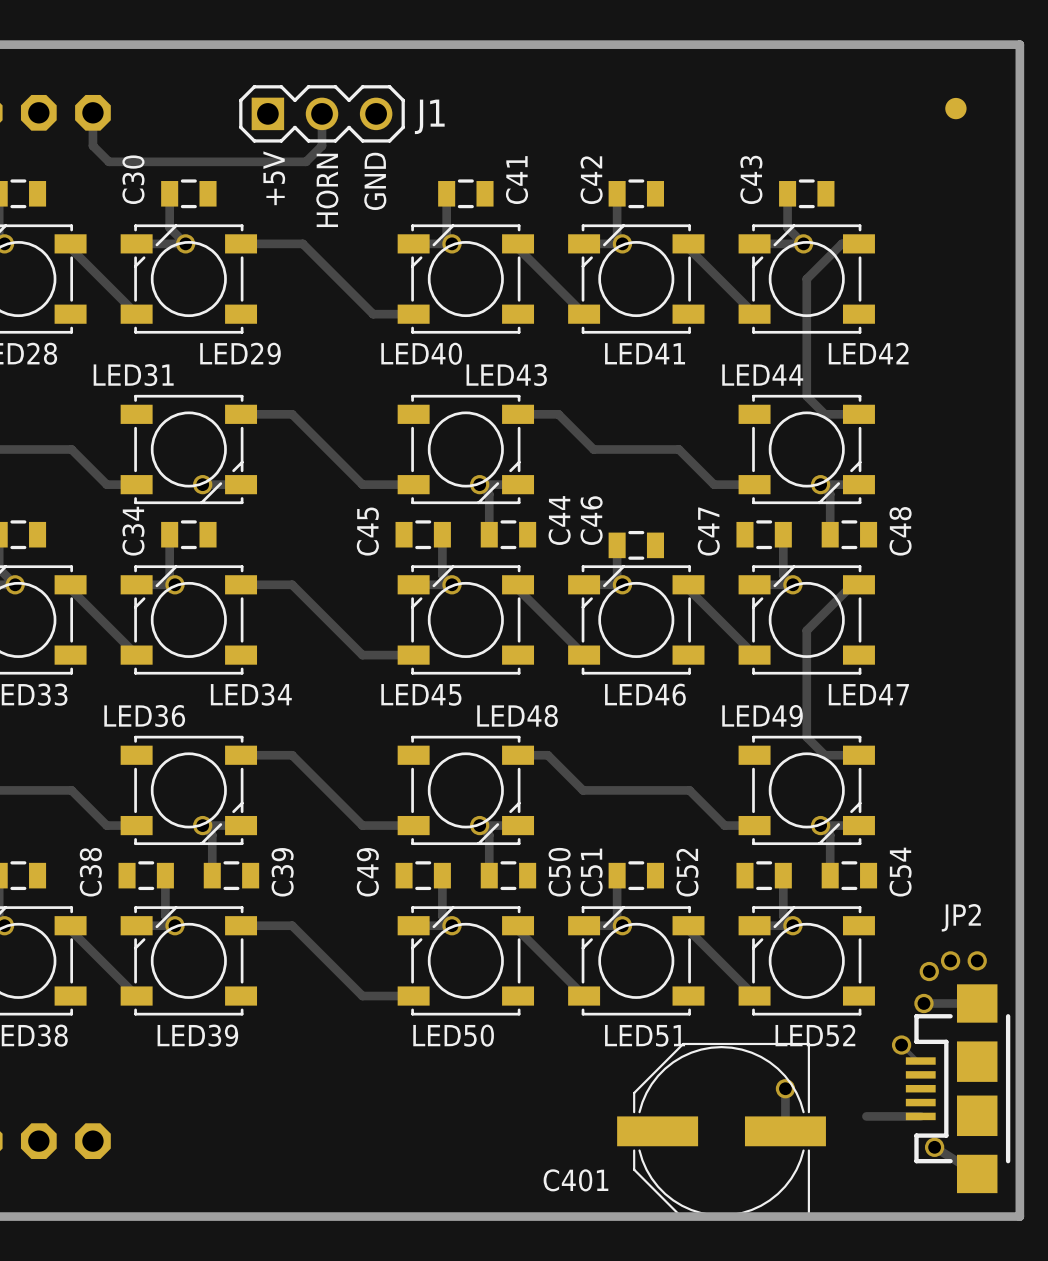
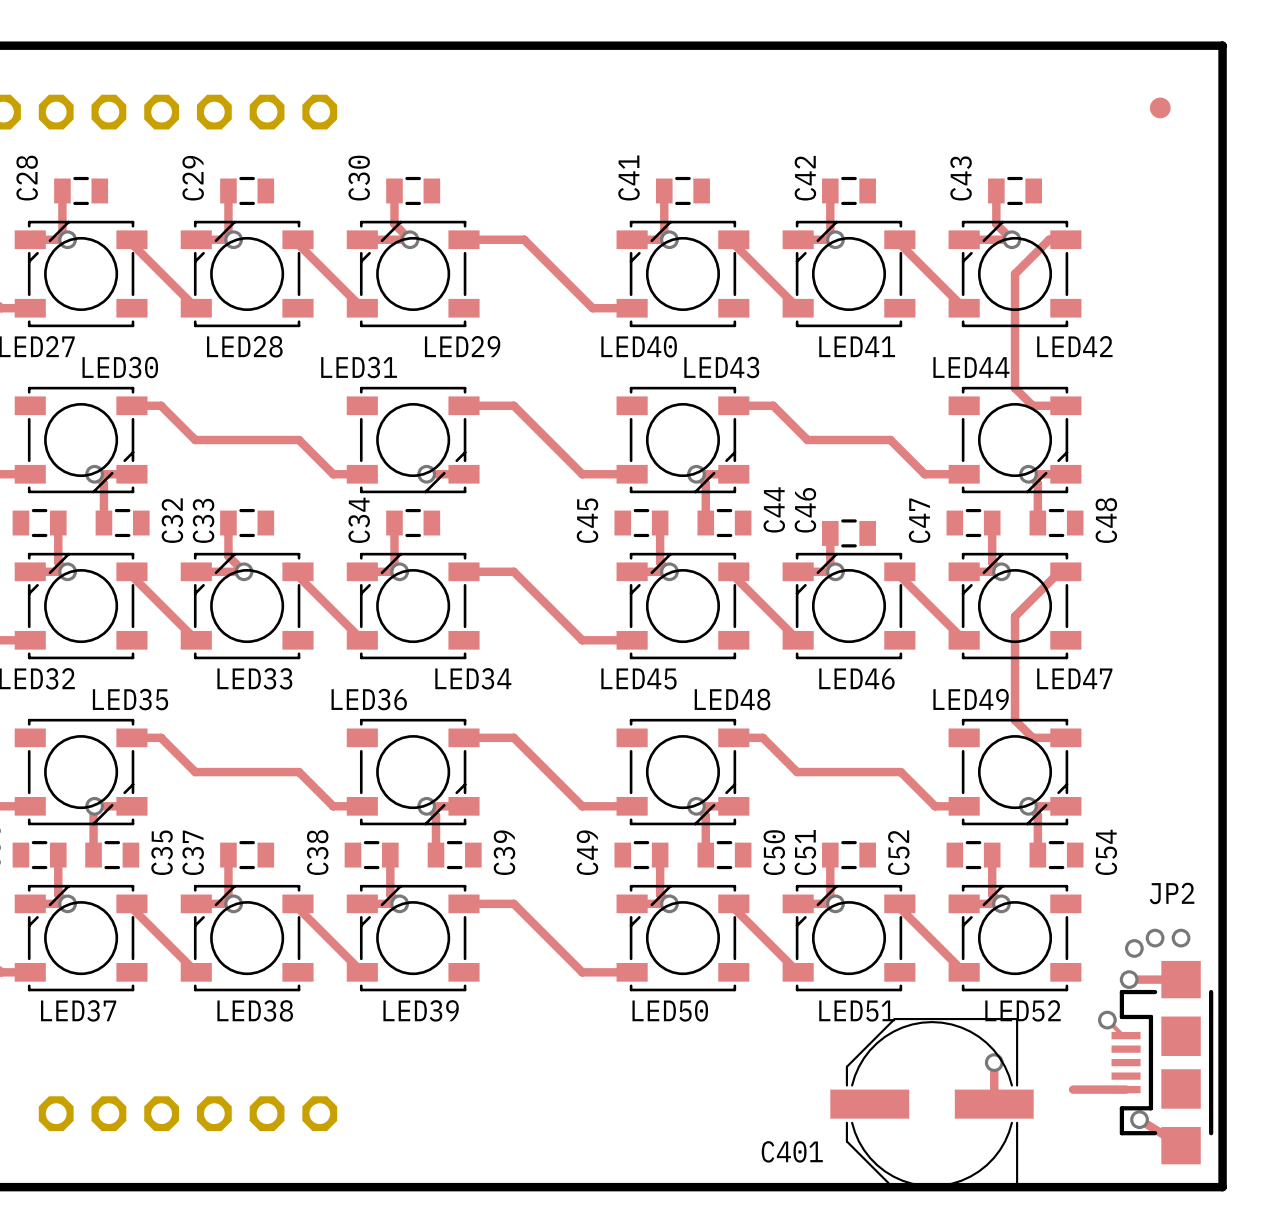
track: (92, 112) (92, 145) (108, 161) (306, 161) (322, 145) (322, 113) -> none
J1: (322, 113) -> none
text: +5V (274, 178) -> none
C41 name position: C41 (516, 180) -> C41 (629, 177)
text: GND (375, 181) -> none
text: HORN (327, 190) -> none

